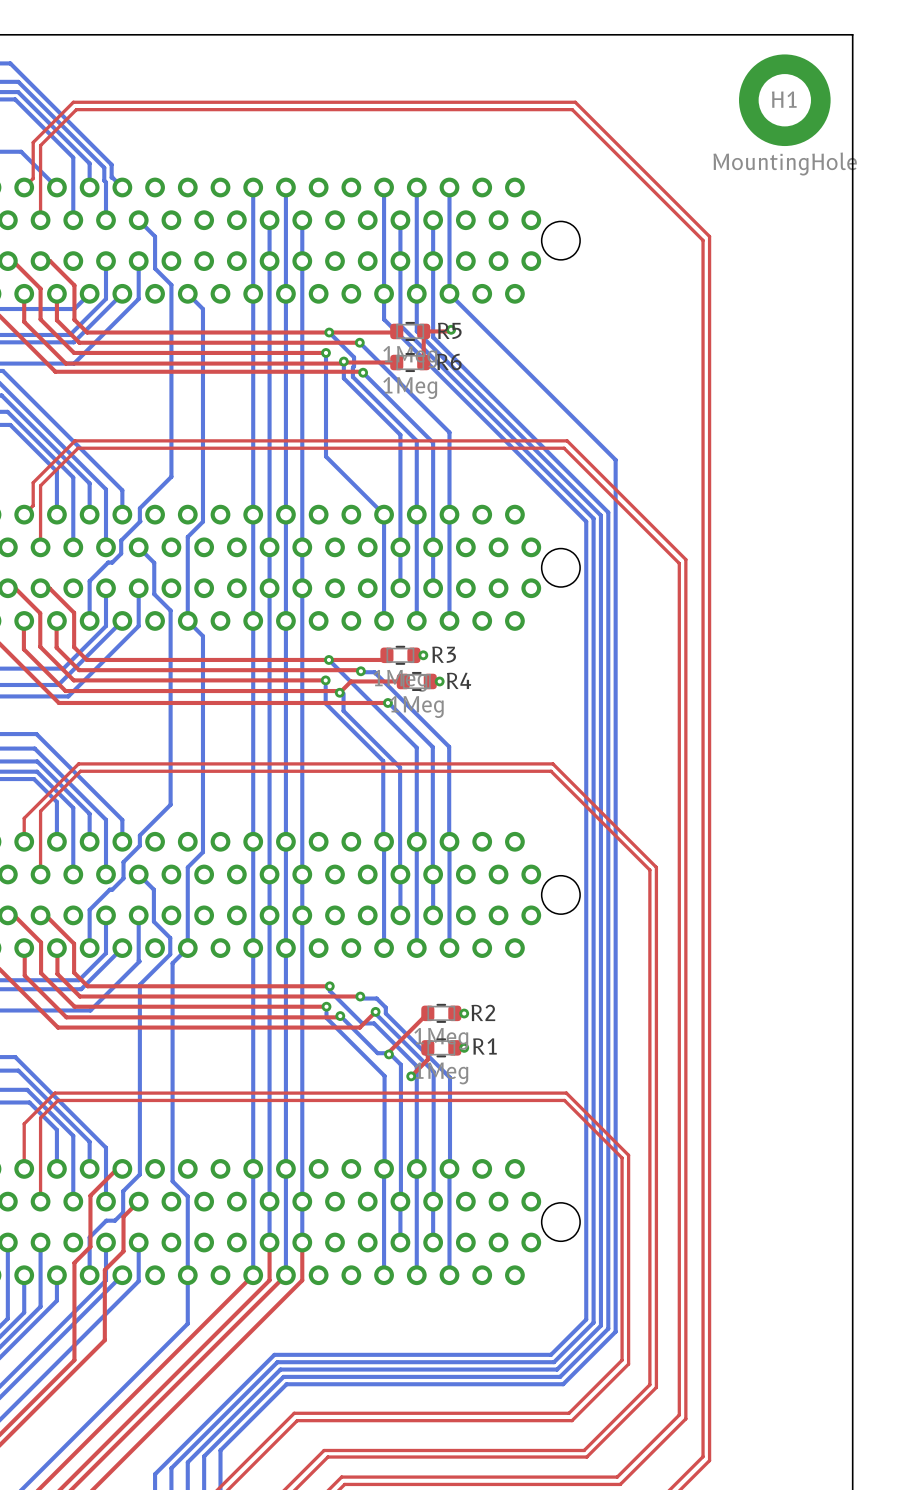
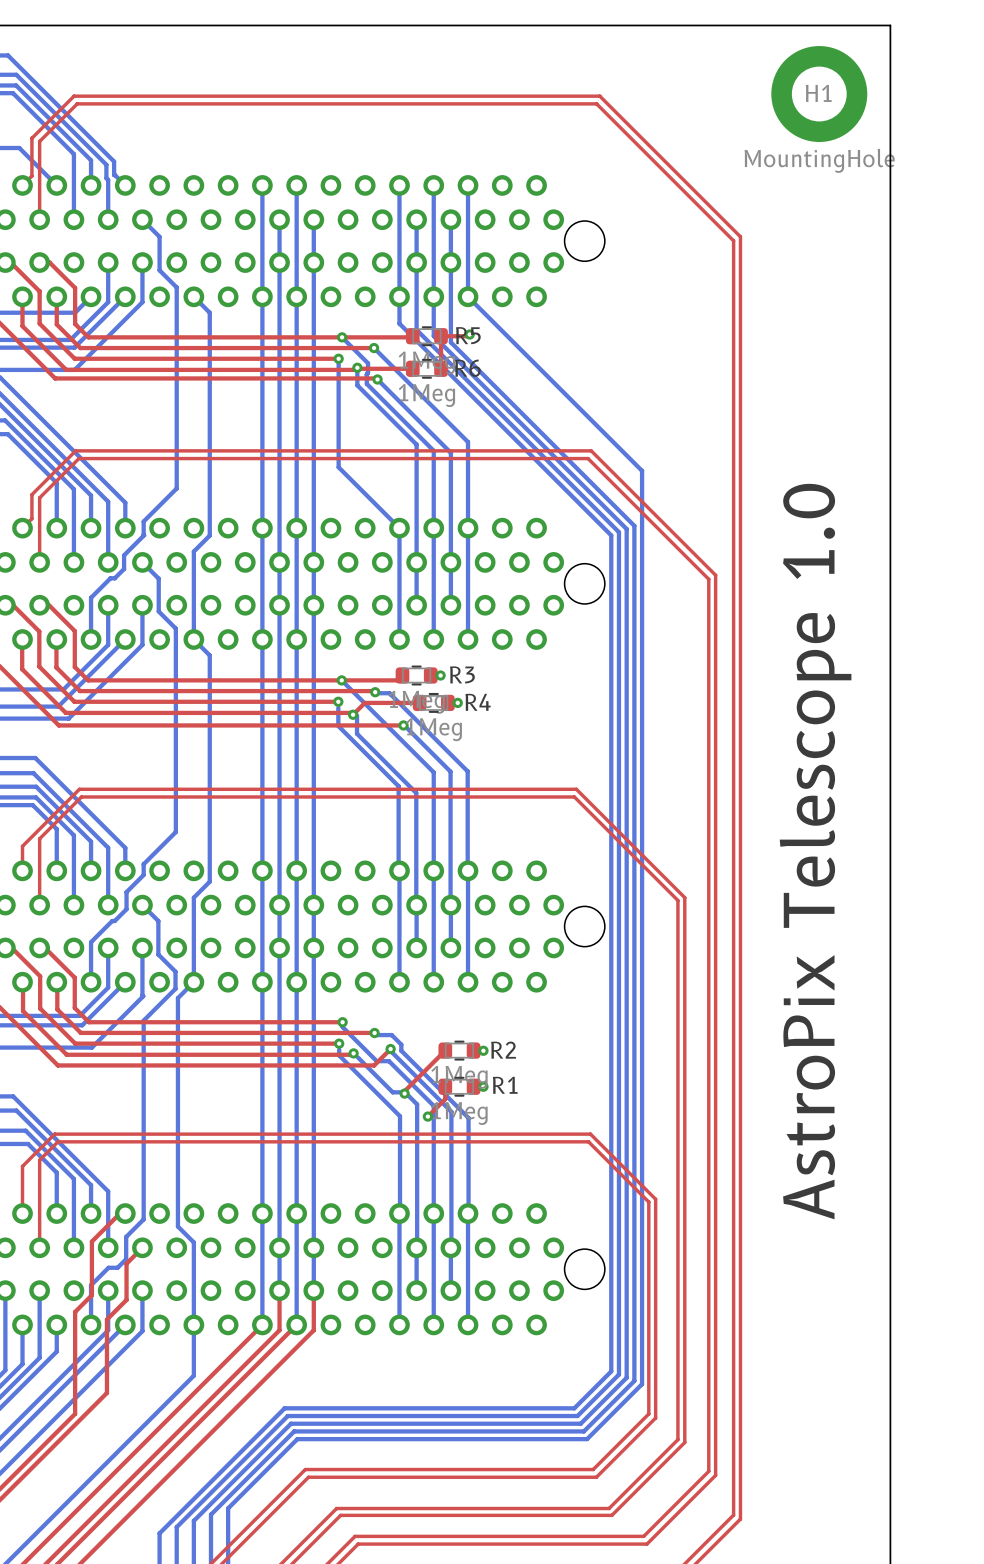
text: none -> AstroPix Telescope 1.0 (815, 851)

